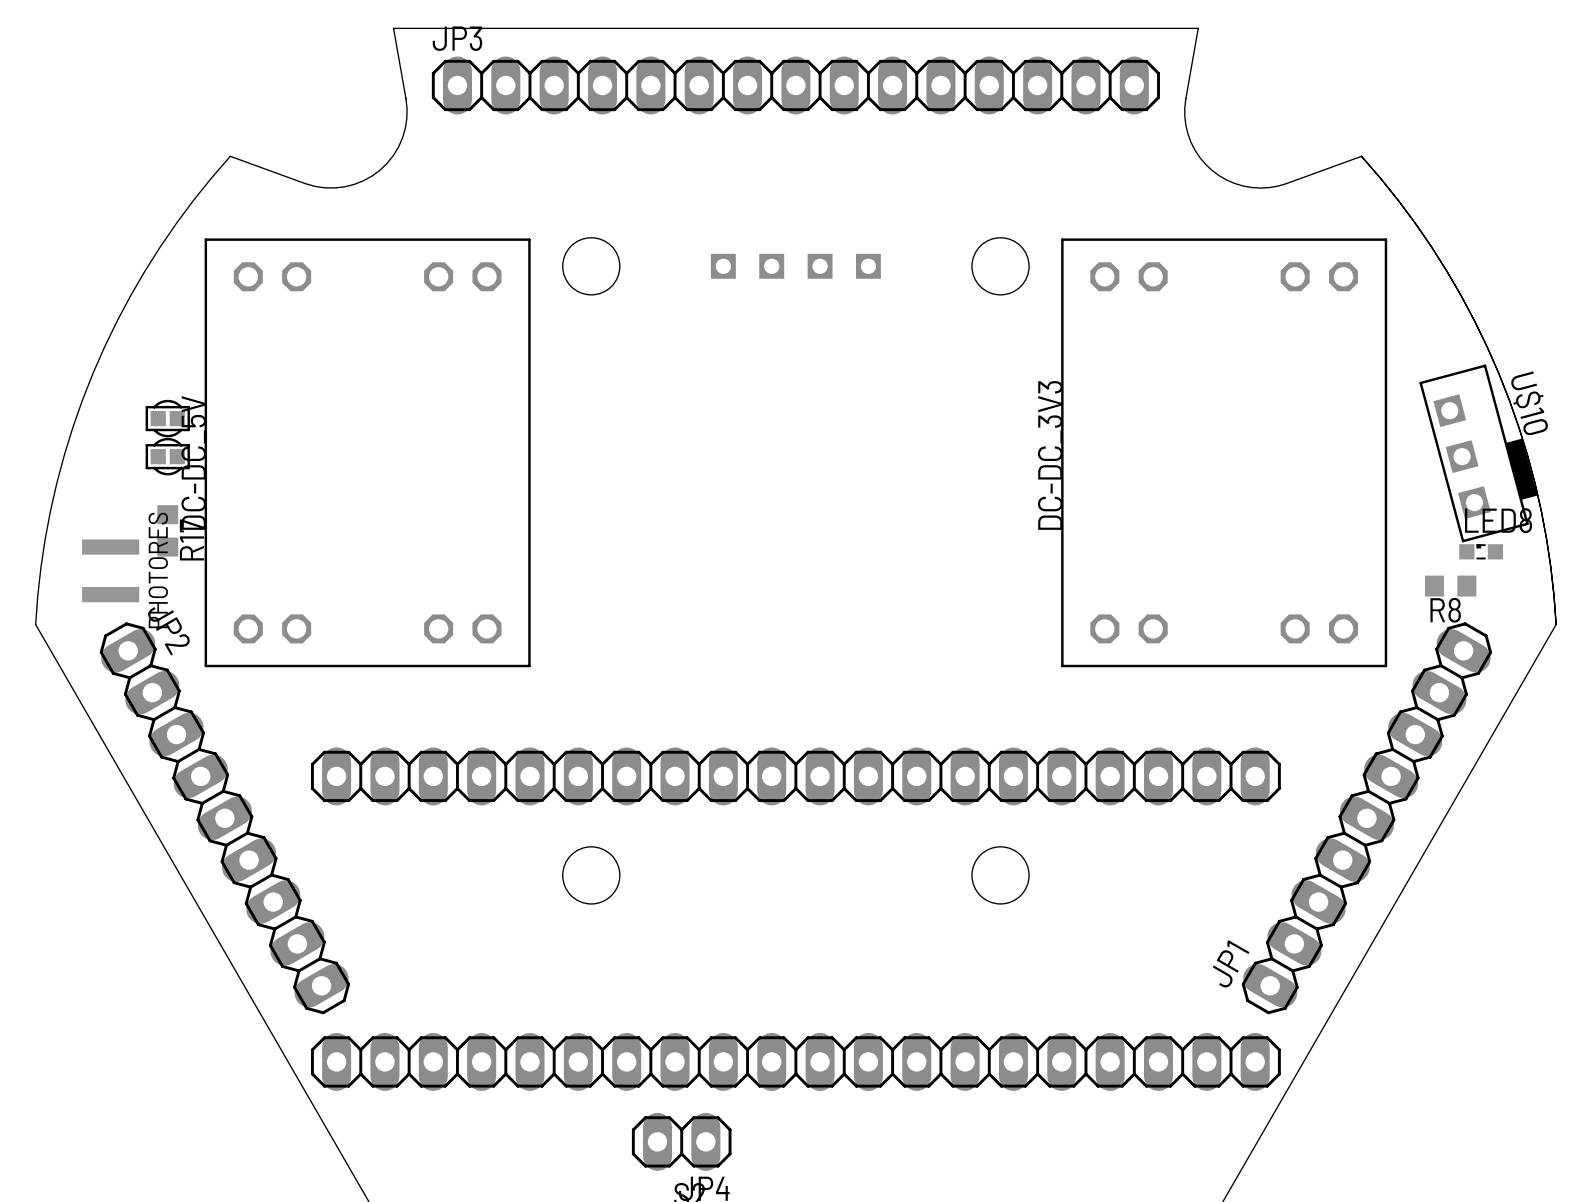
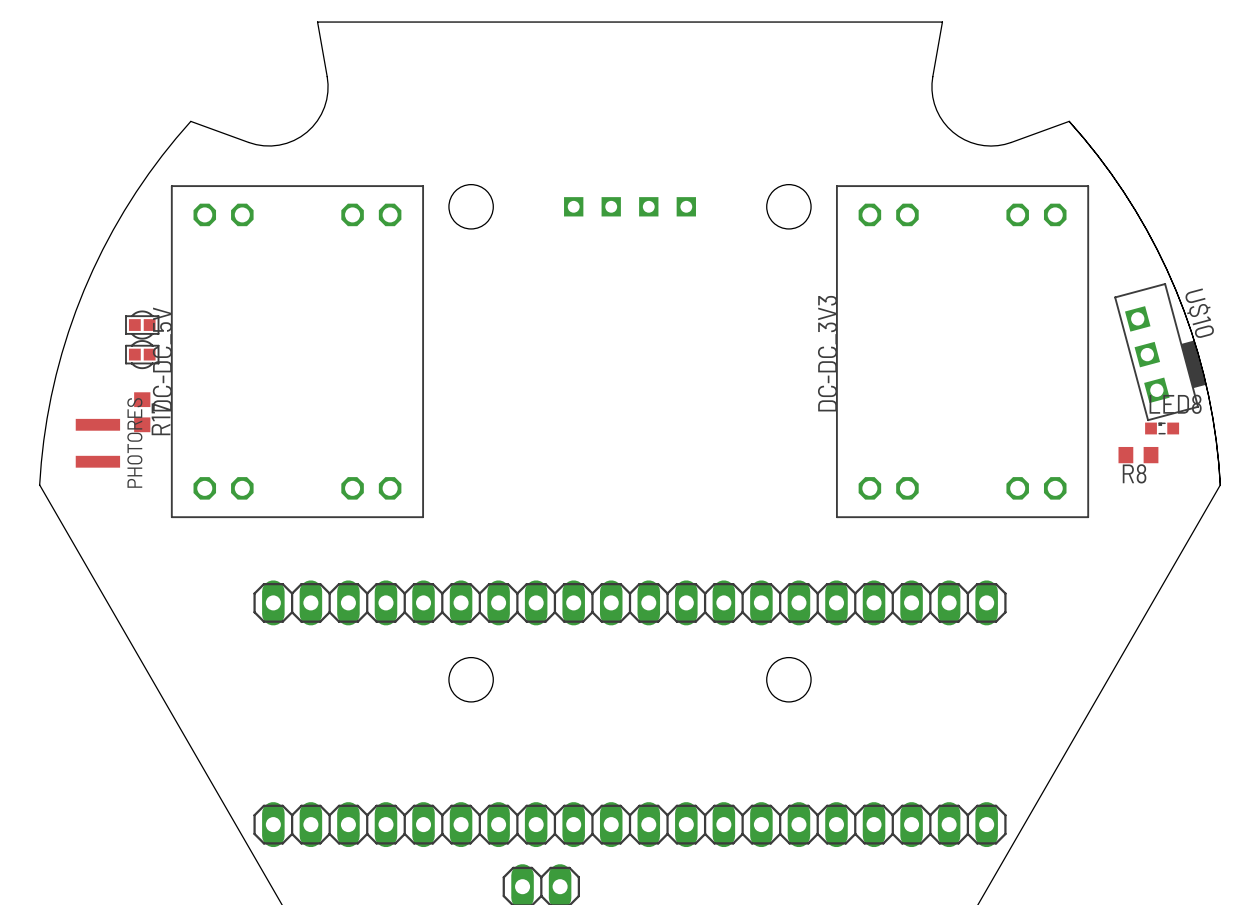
JP3: (795, 85) -> none
JP2: (224, 818) -> none
JP1: (1366, 818) -> none

